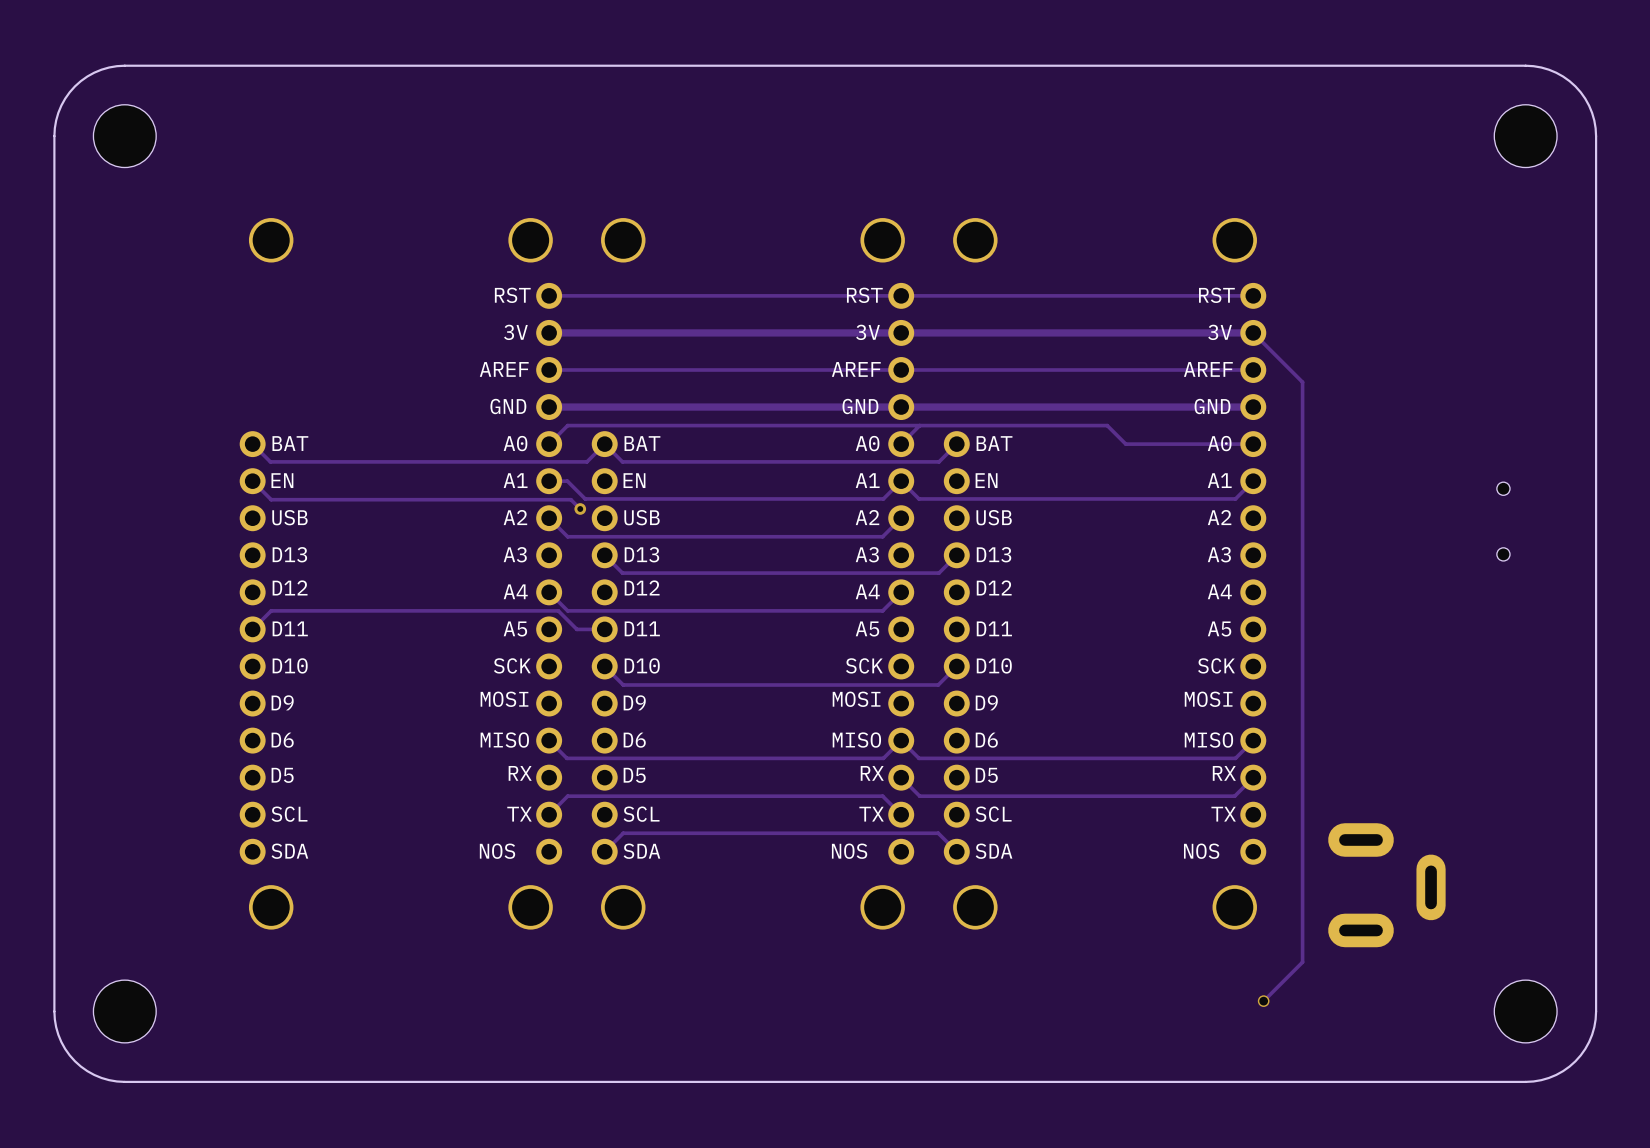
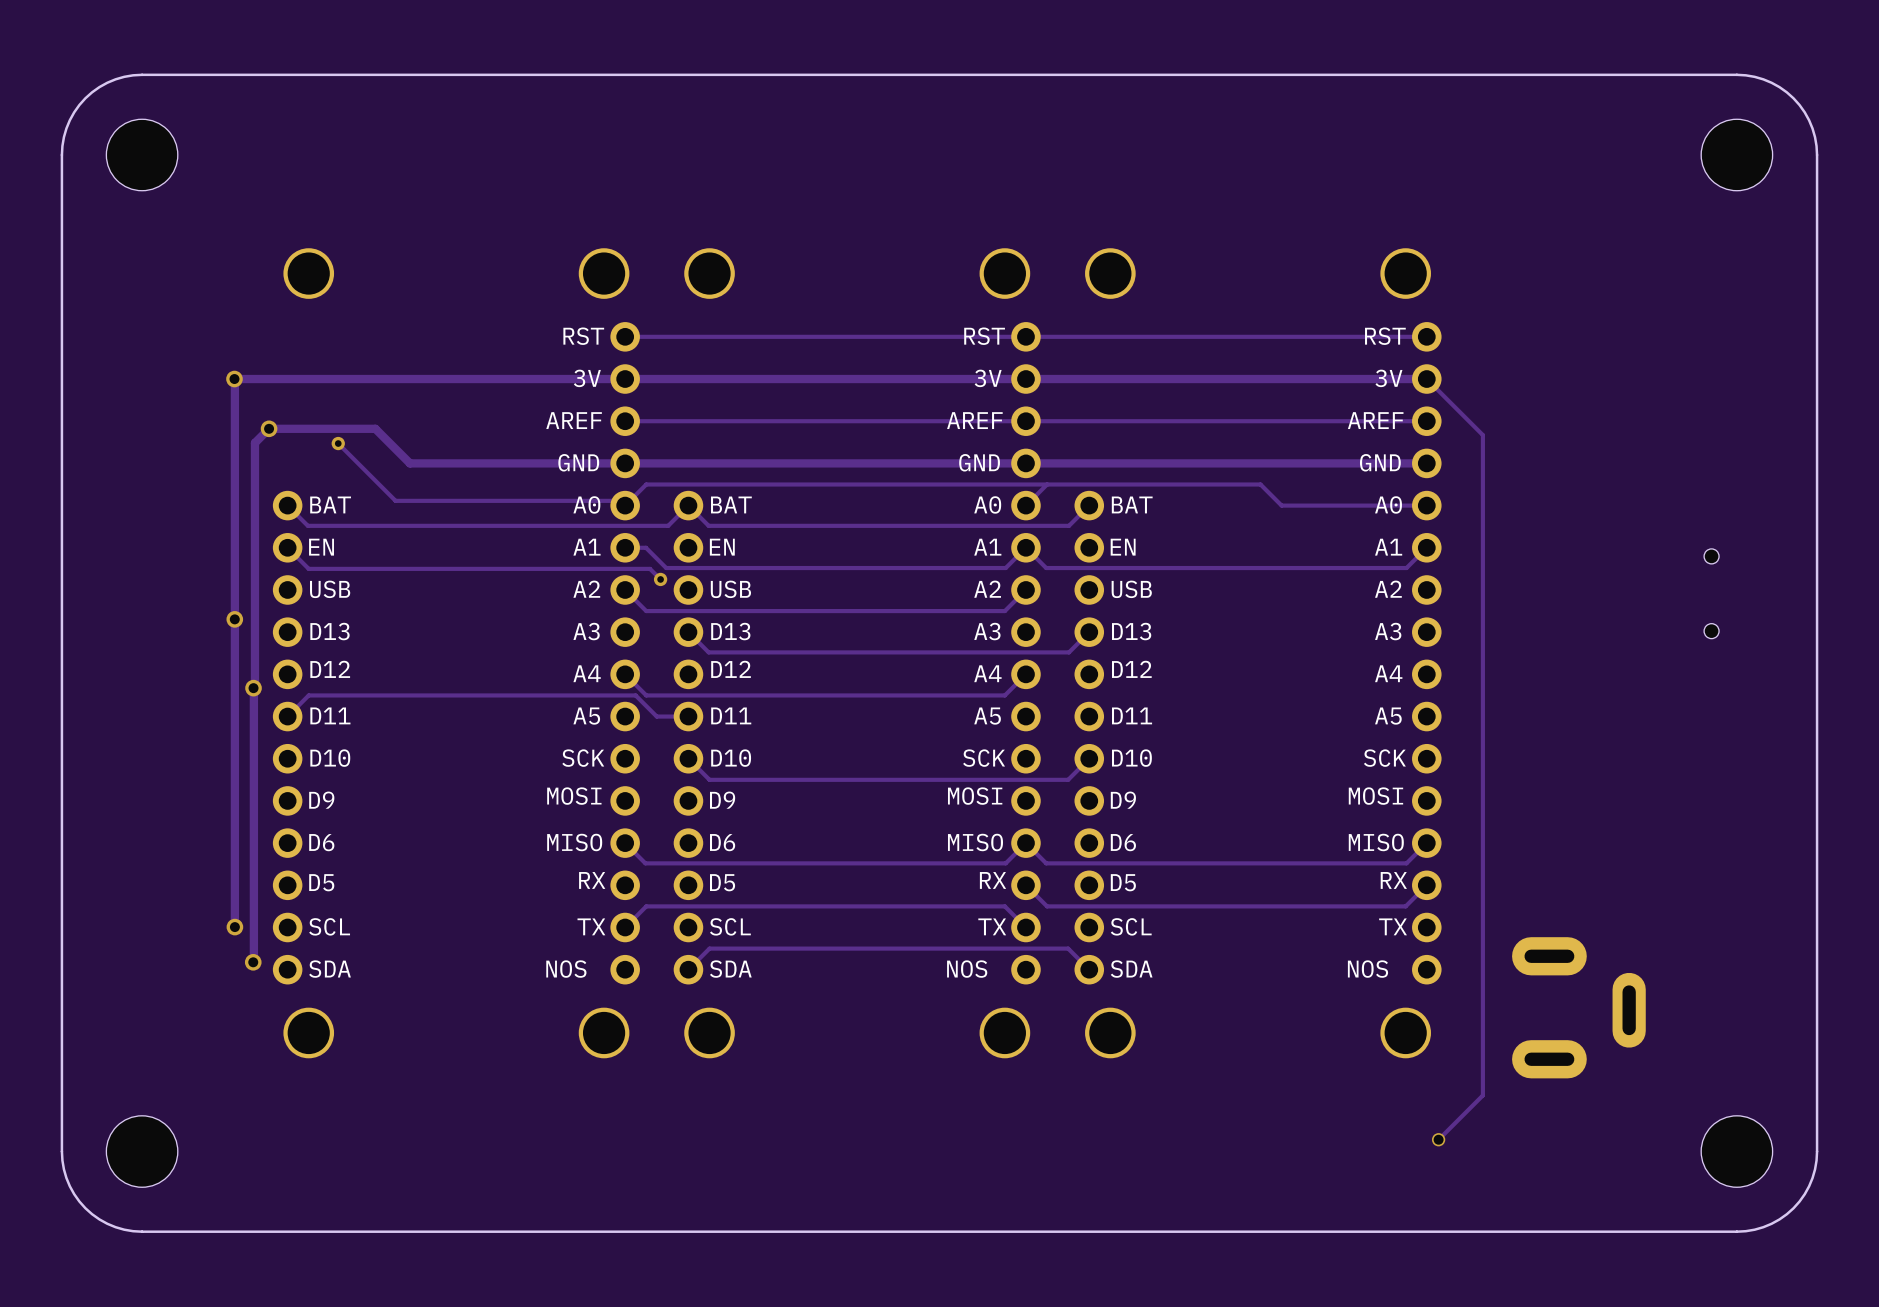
via: none -> (234, 379)
track: none -> (625, 379) (234, 379) (234, 619)
via: none -> (269, 428)
track: none -> (338, 443) (395, 500) (629, 500)
via: none -> (338, 443)
track: none -> (625, 463) (409, 463) (375, 428) (269, 428) (254, 442) (253, 962)
track: none -> (234, 619) (234, 927)
via: none -> (234, 619)
via: none -> (253, 688)
via: none -> (234, 927)
via: none -> (253, 962)

